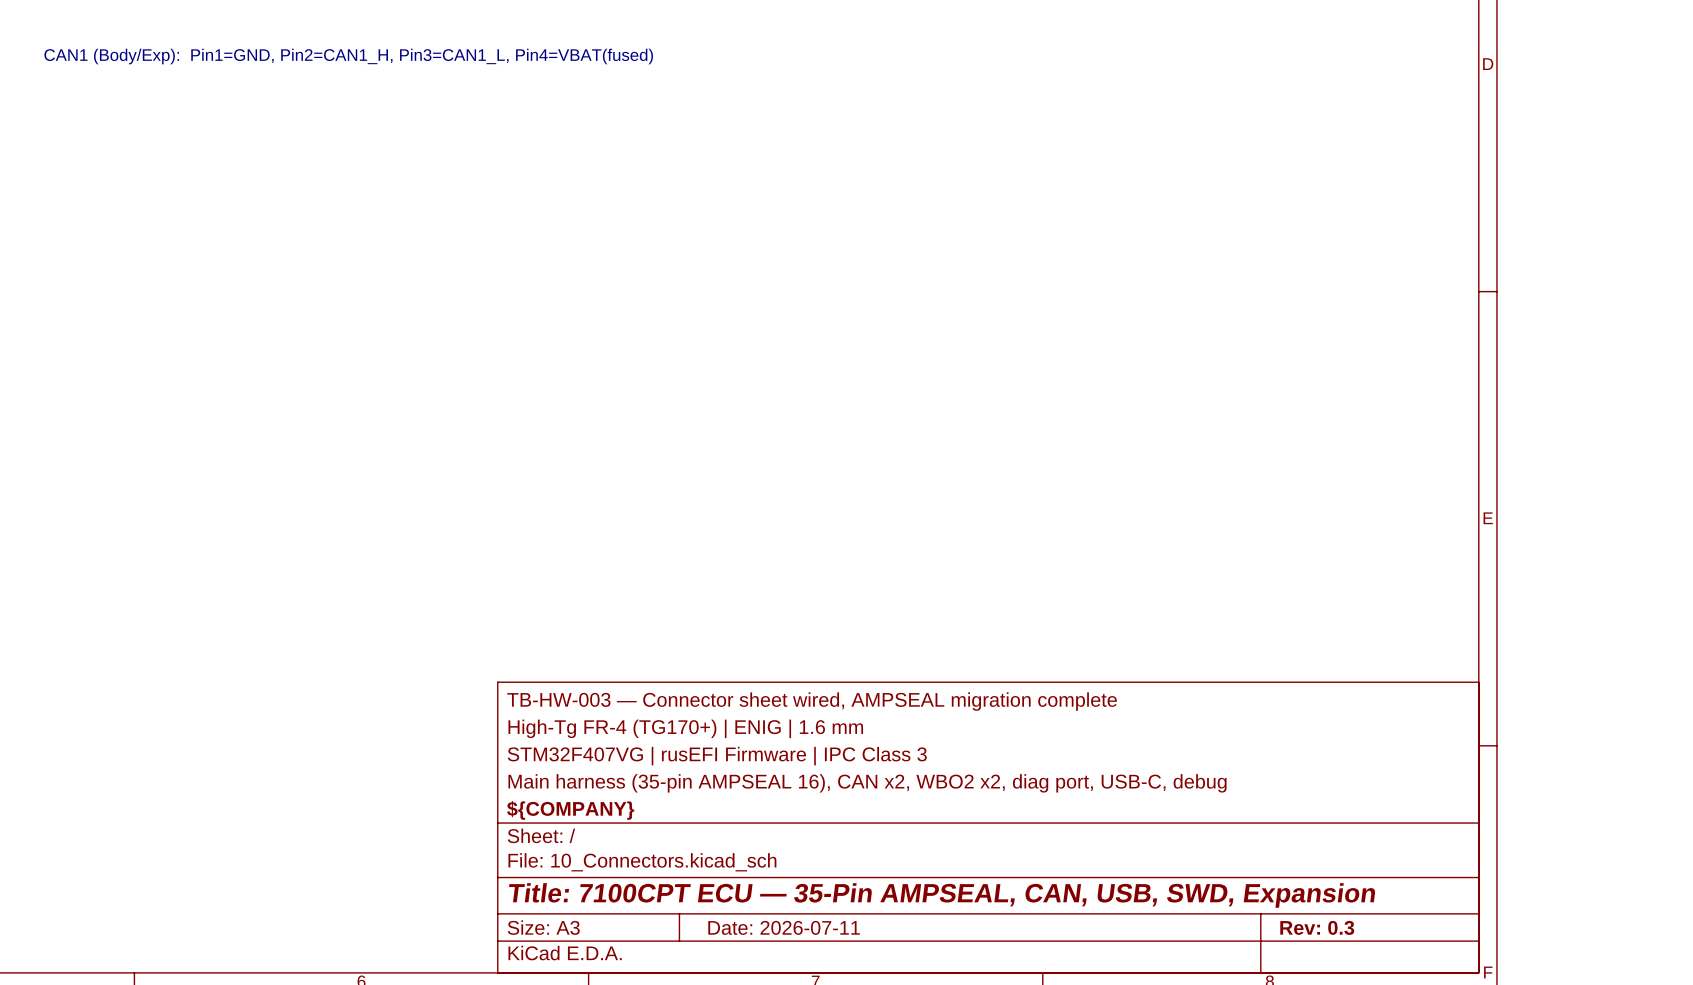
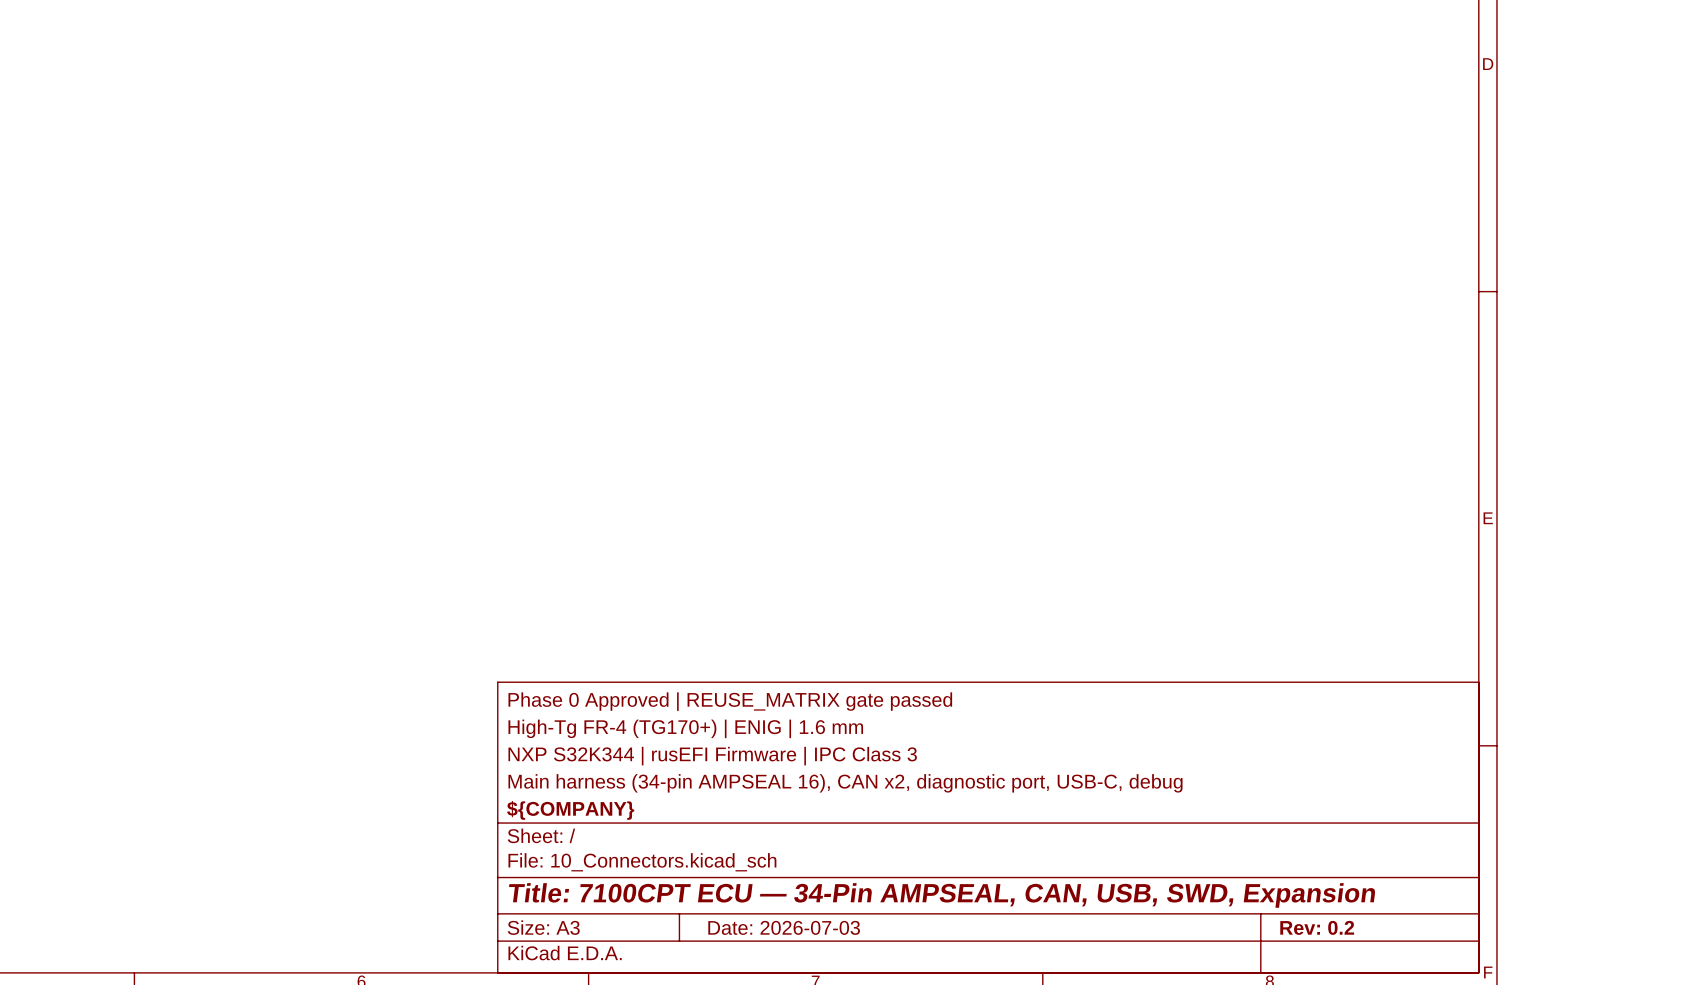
text: CAN1 (Body/Exp): Pin1=GND, Pin2=CAN1_H, Pin3=CAN1_L, Pin4=VBAT(fused) (348, 56) -> none
title block: TB-HW-003 — Connector sheet wired, AMPSEAL migration complete (812, 701) -> Phase 0 Approved | REUSE_MATRIX gate passed (730, 701)
title block: STM32F407VG | rusEFI Firmware | IPC Class 3 (717, 756) -> NXP S32K344 | rusEFI Firmware | IPC Class 3 (712, 756)
title block: Main harness (35-pin AMPSEAL 16), CAN x2, WBO2 x2, diag port, USB-C, debug (867, 783) -> Main harness (34-pin AMPSEAL 16), CAN x2, diagnostic port, USB-C, debug (845, 783)
title block: Title: 7100CPT ECU — 35-Pin AMPSEAL, CAN, USB, SWD, Expansion (942, 895) -> Title: 7100CPT ECU — 34-Pin AMPSEAL, CAN, USB, SWD, Expansion (942, 895)
title block: Date: 2026-07-11 (784, 927) -> Date: 2026-07-03 (784, 927)
title block: Rev: 0.3 (1317, 927) -> Rev: 0.2 (1317, 927)

